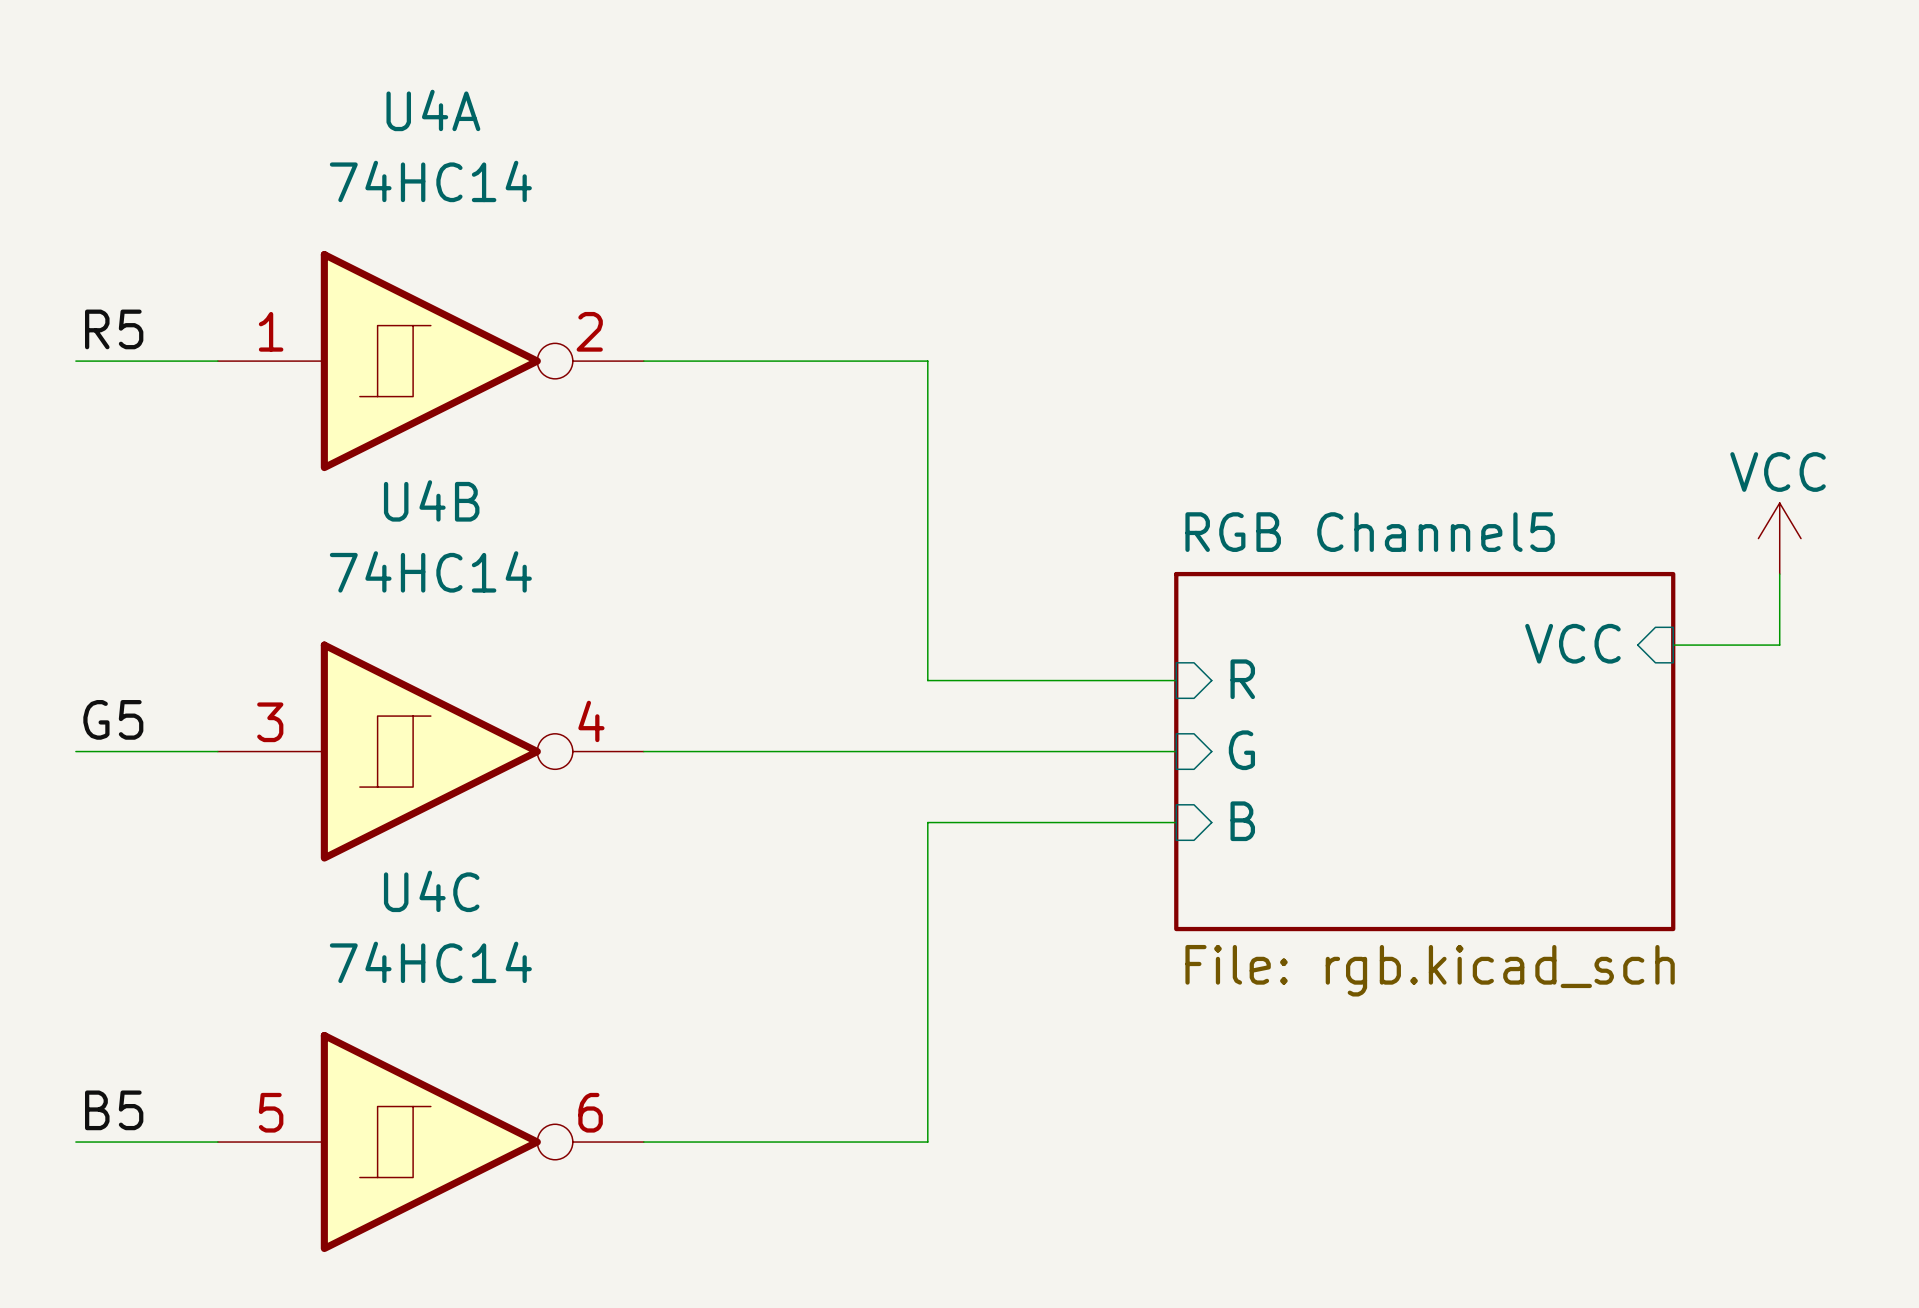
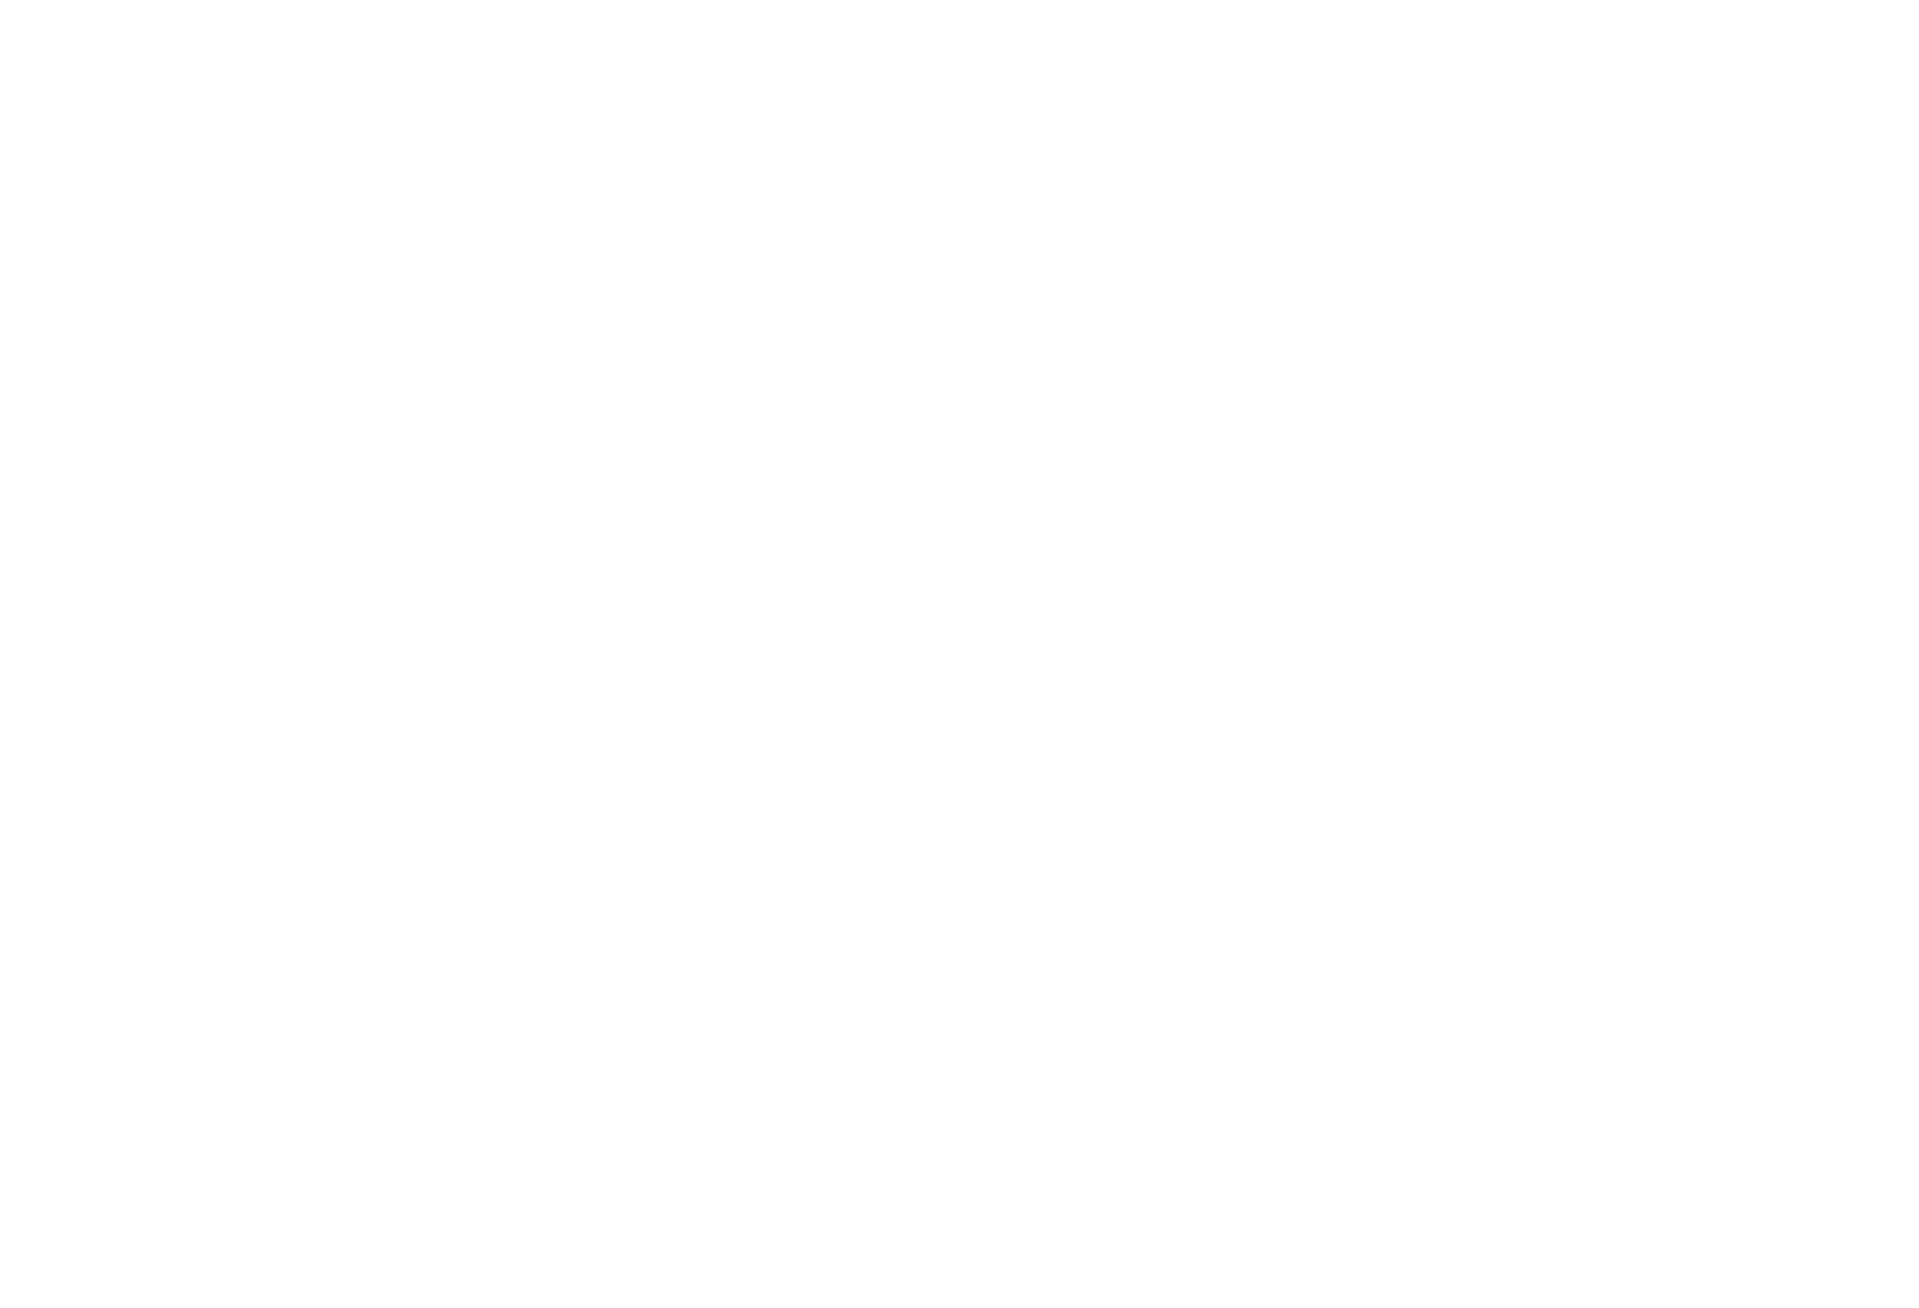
label: R5 (114, 329) -> none
wire: (75, 361) (217, 361) -> none
U4A: 74HC14 (430, 361) -> none
wire: (643, 361) (927, 361) (927, 680) (1176, 680) -> none
power symbol: VCC (1779, 538) -> none
wire: (1779, 574) (1779, 645) (1673, 645) -> none
sheet pin: VCC (1572, 643) -> none
sheet pin: R (1242, 679) -> none
label: G5 (113, 719) -> none
sheet pin: G (1241, 750) -> none
wire: (75, 751) (217, 751) -> none
U4B: 74HC14 (430, 751) -> none
wire: (643, 751) (1176, 751) -> none
sheet RGB Channel5: File: rgb.kicad_sch (1424, 751) -> none
sheet pin: B (1242, 821) -> none
wire: (1176, 822) (927, 822) (927, 1142) (643, 1142) -> none
label: B5 (114, 1110) -> none
wire: (75, 1142) (217, 1142) -> none
U4C: 74HC14 (430, 1142) -> none

